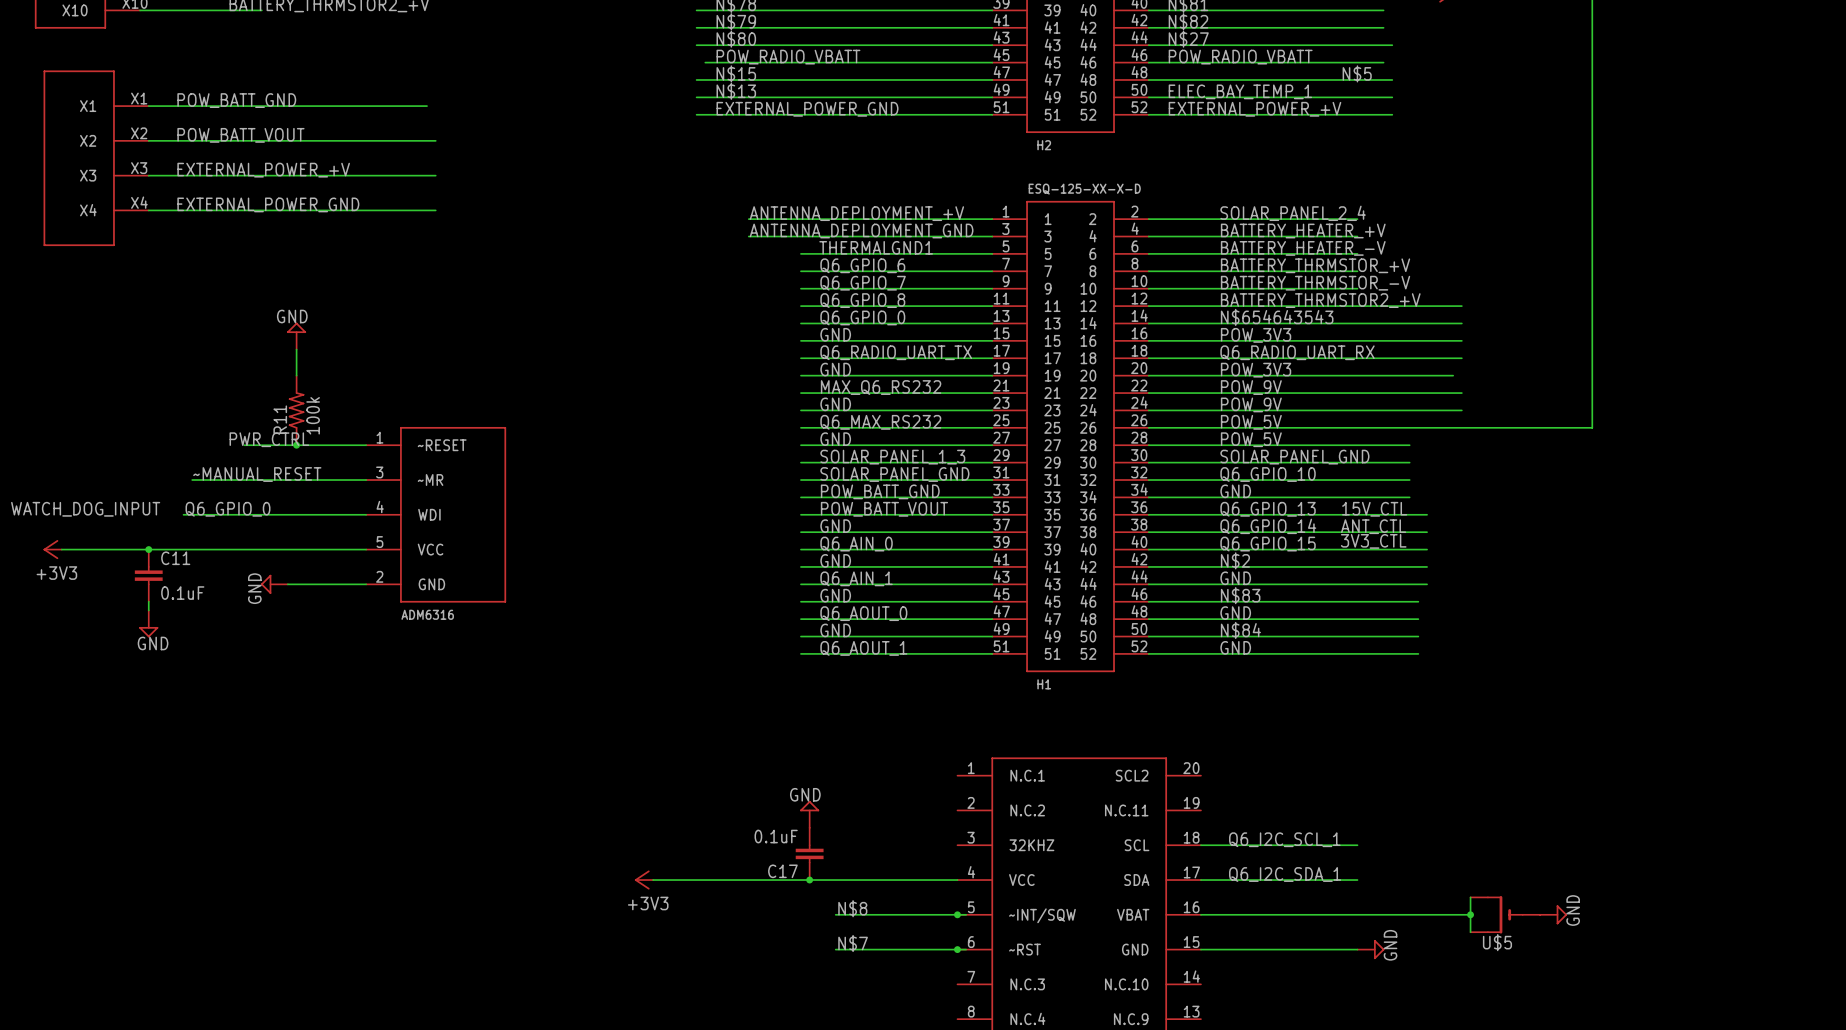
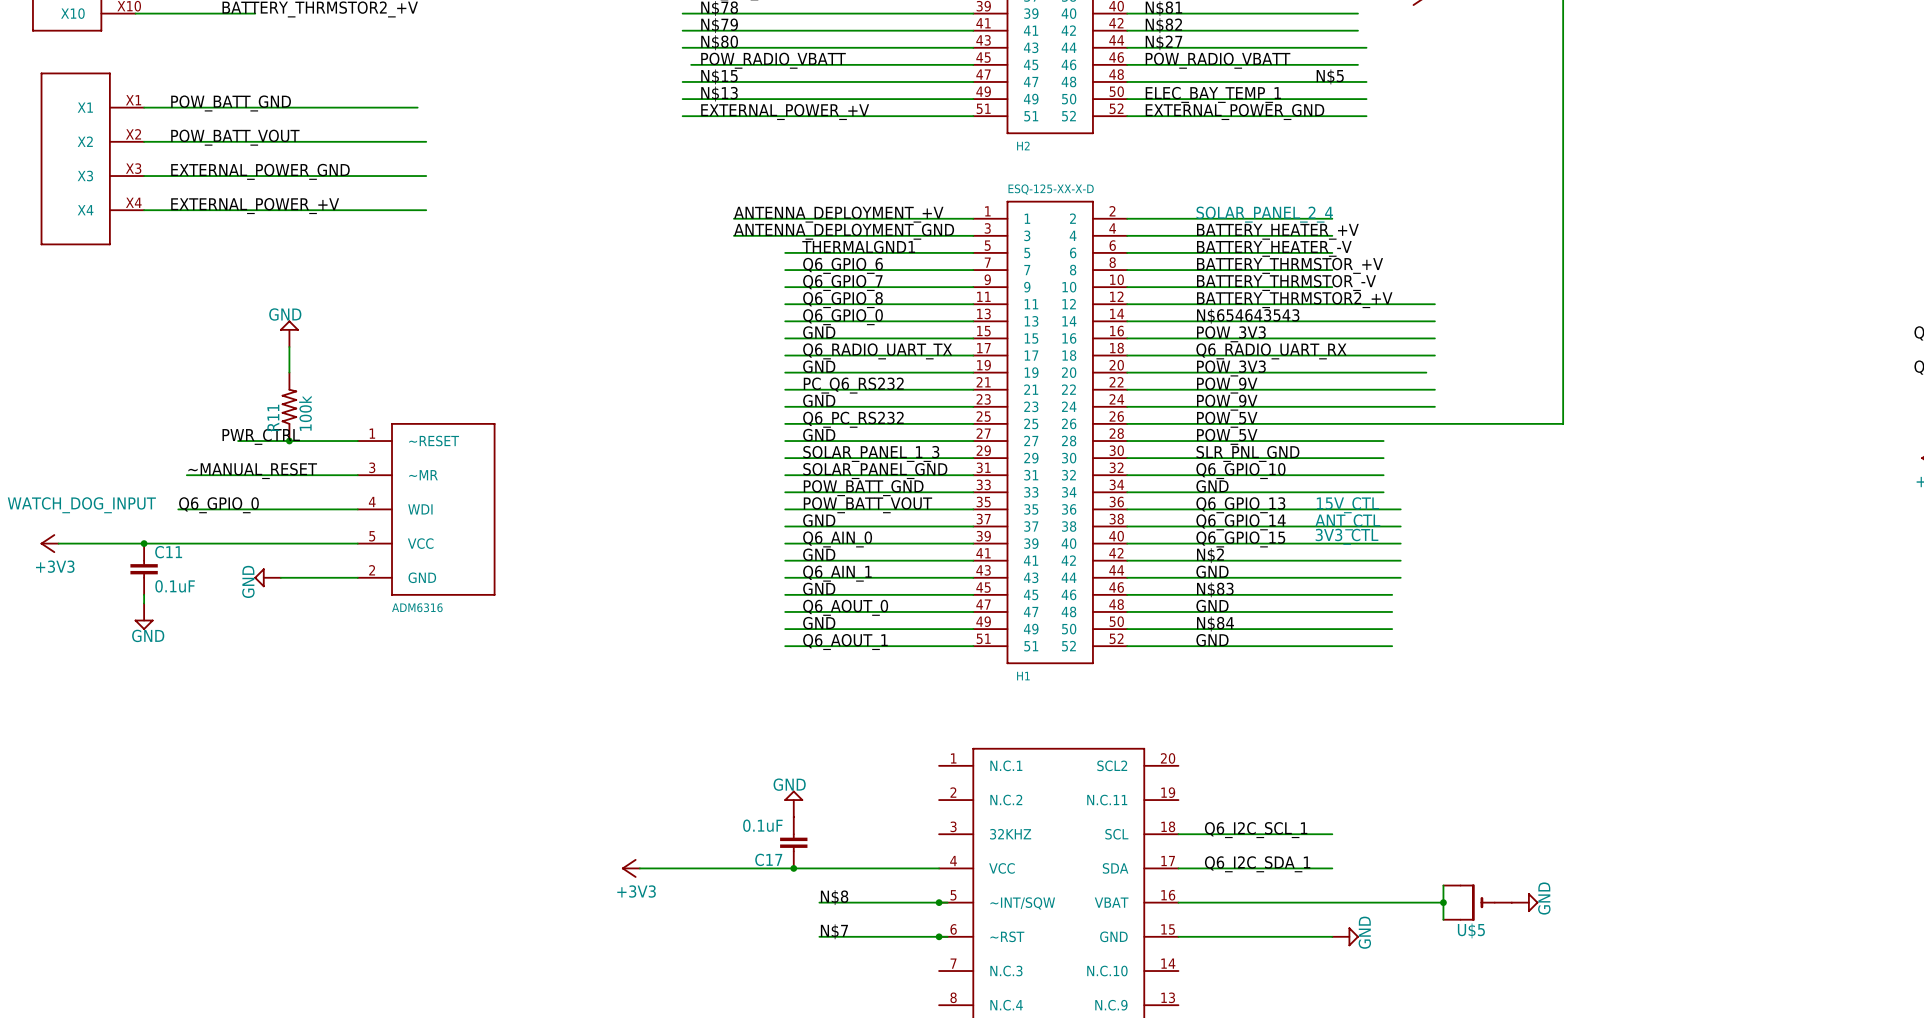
label: EXTERNAL_POWER_GND (807, 109) -> EXTERNAL_POWER_+V (785, 112)
label: EXTERNAL_POWER_+V (1255, 109) -> EXTERNAL_POWER_GND (1234, 112)
label: EXTERNAL_POWER_+V (263, 170) -> EXTERNAL_POWER_GND (260, 171)
label: EXTERNAL_POWER_GND (268, 204) -> EXTERNAL_POWER_+V (255, 206)
label: MAX_Q6_RS232 (881, 387) -> PC_Q6_RS232 (853, 385)
label: Q6_MAX_RS232 (880, 422) -> Q6_PC_RS232 (853, 419)
label: SOLAR_PANEL_GND (1294, 457) -> SLR_PNL_GND (1247, 453)

